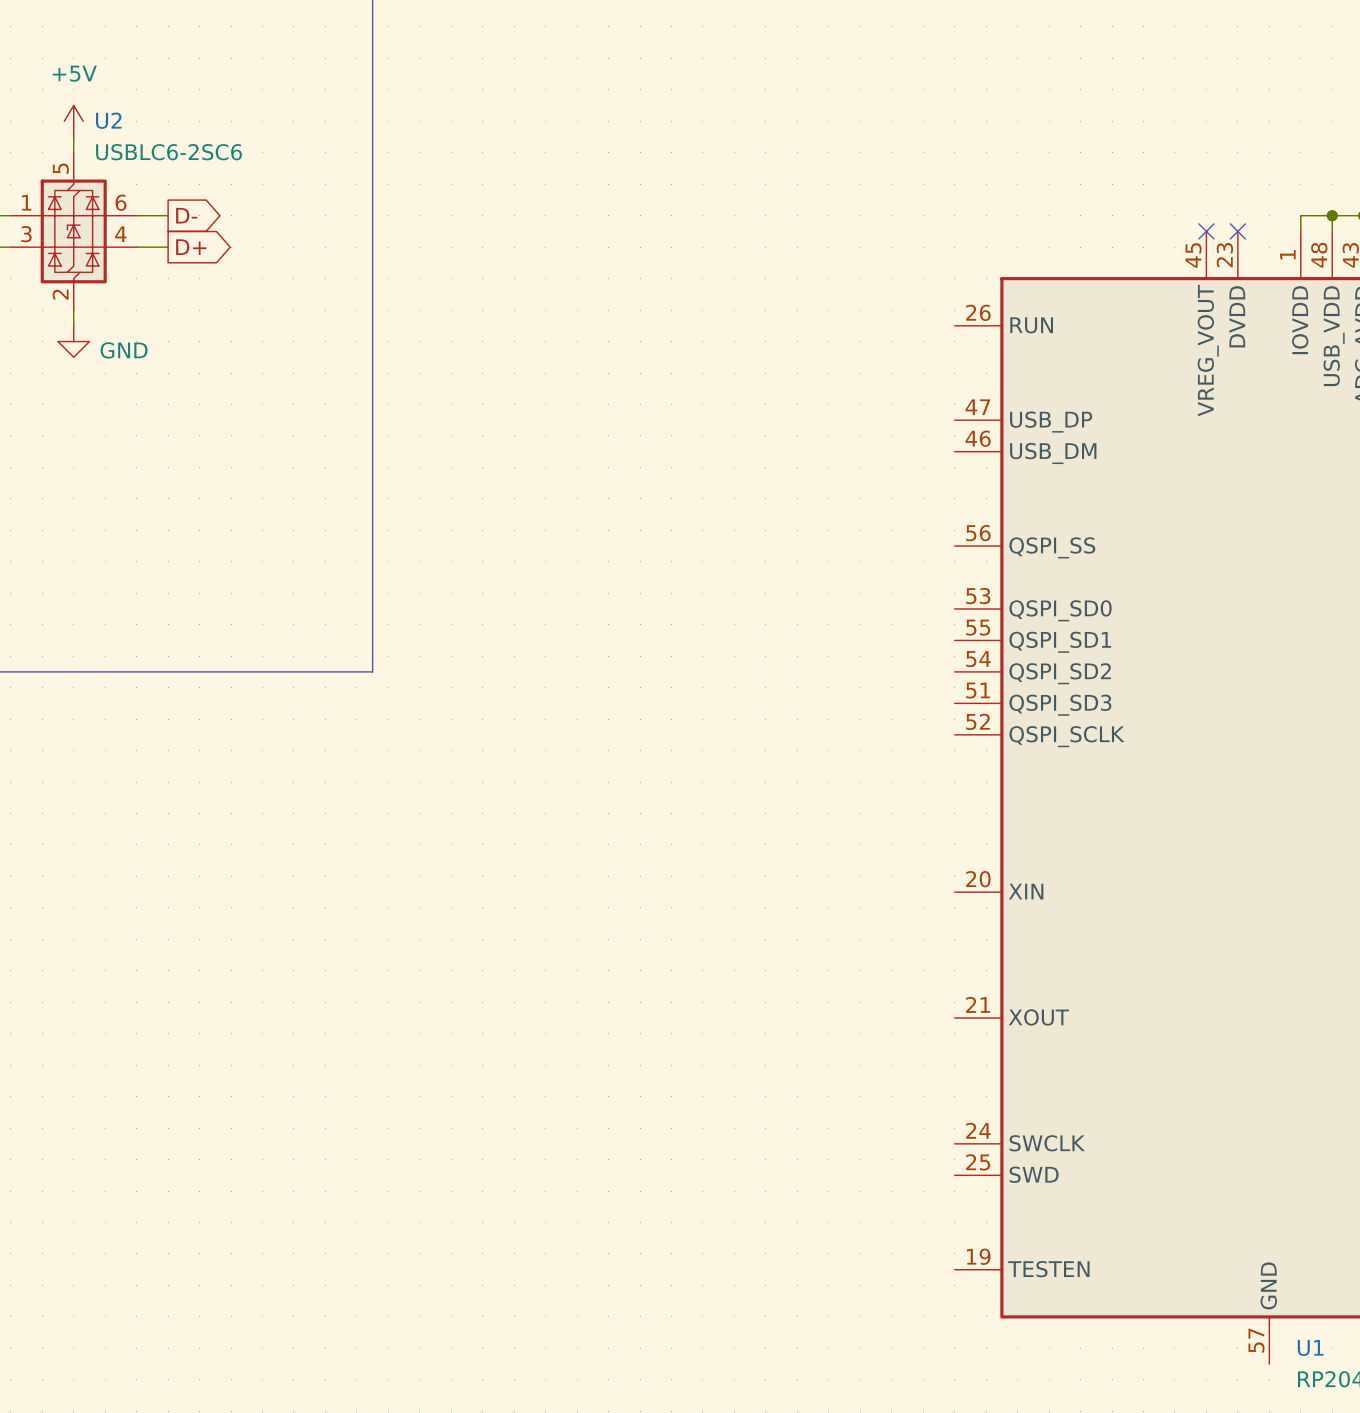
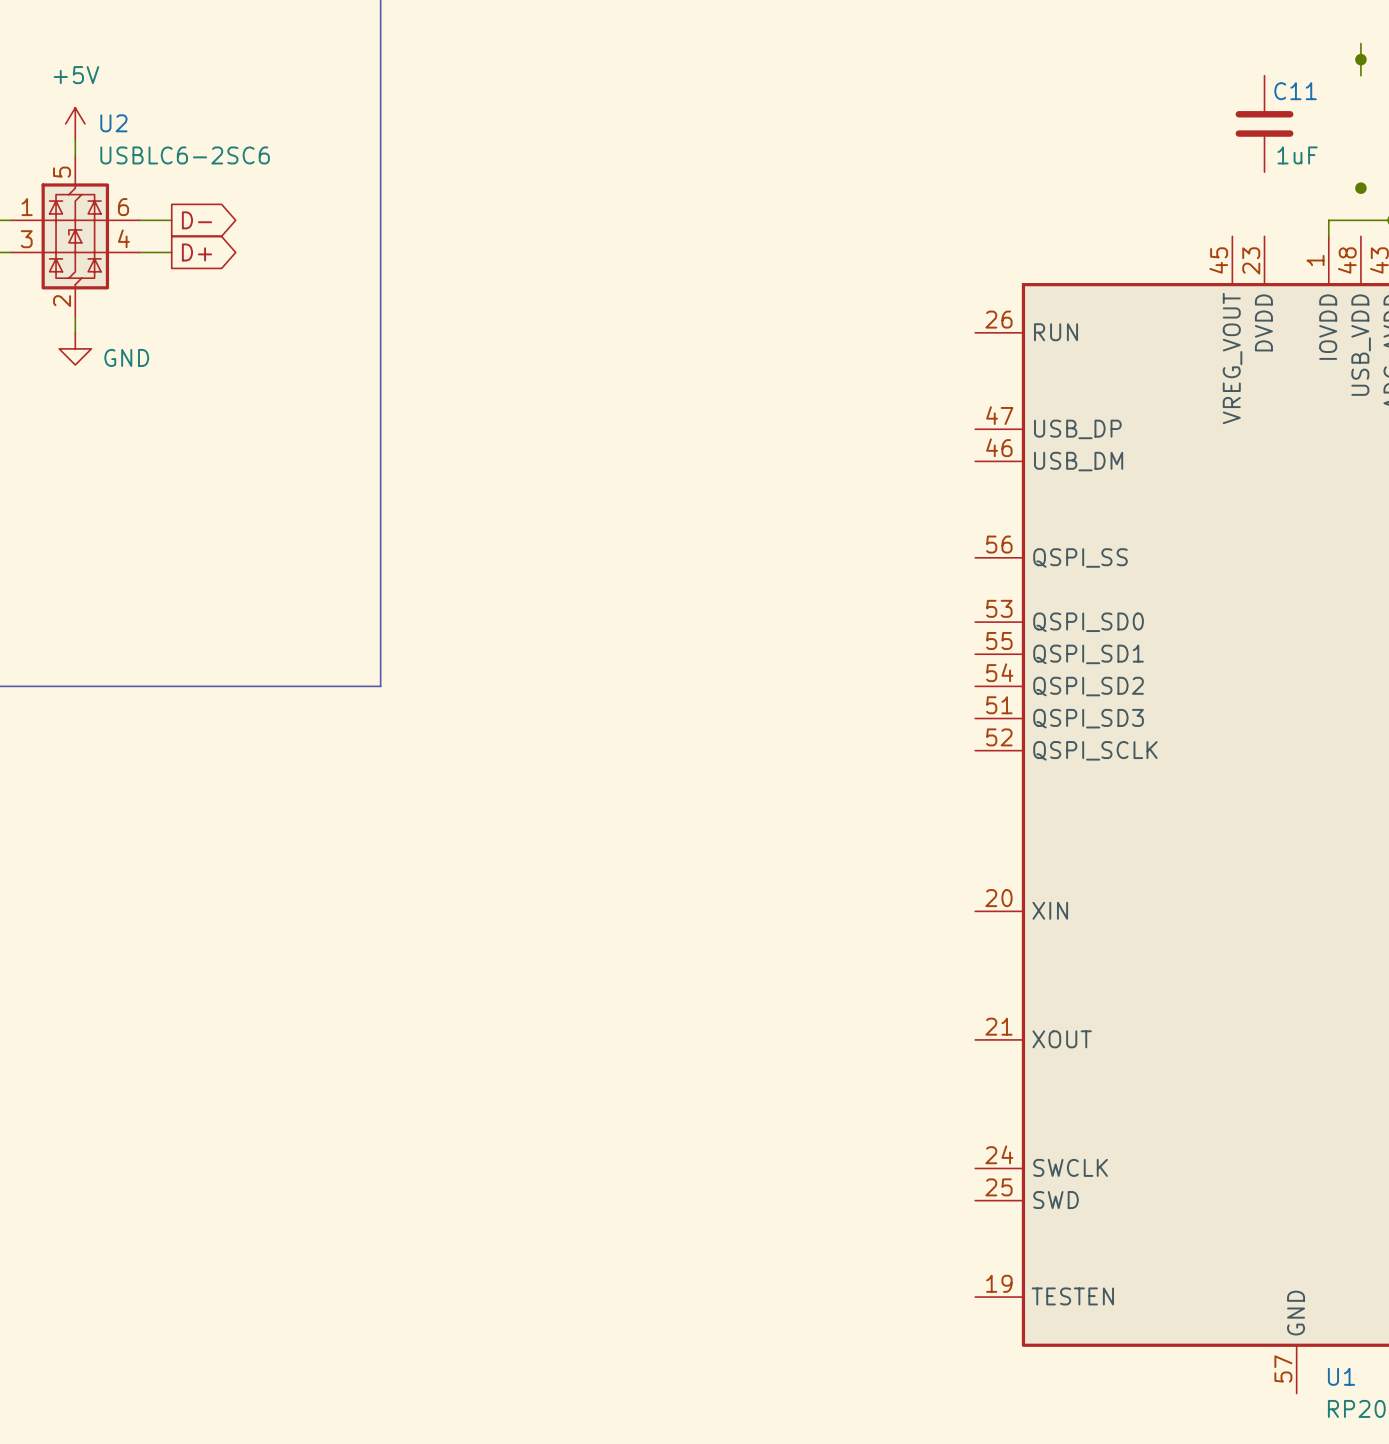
wire: none -> (1360, 43) (1360, 75)
junction: none -> (1360, 59)
C11: none -> 1uF (1264, 123)
wire: (1332, 215) (1332, 231) -> none
junction position: (1332, 215) -> (1360, 188)
no-connect mark: (1206, 231) -> none
no-connect mark: (1237, 231) -> none

